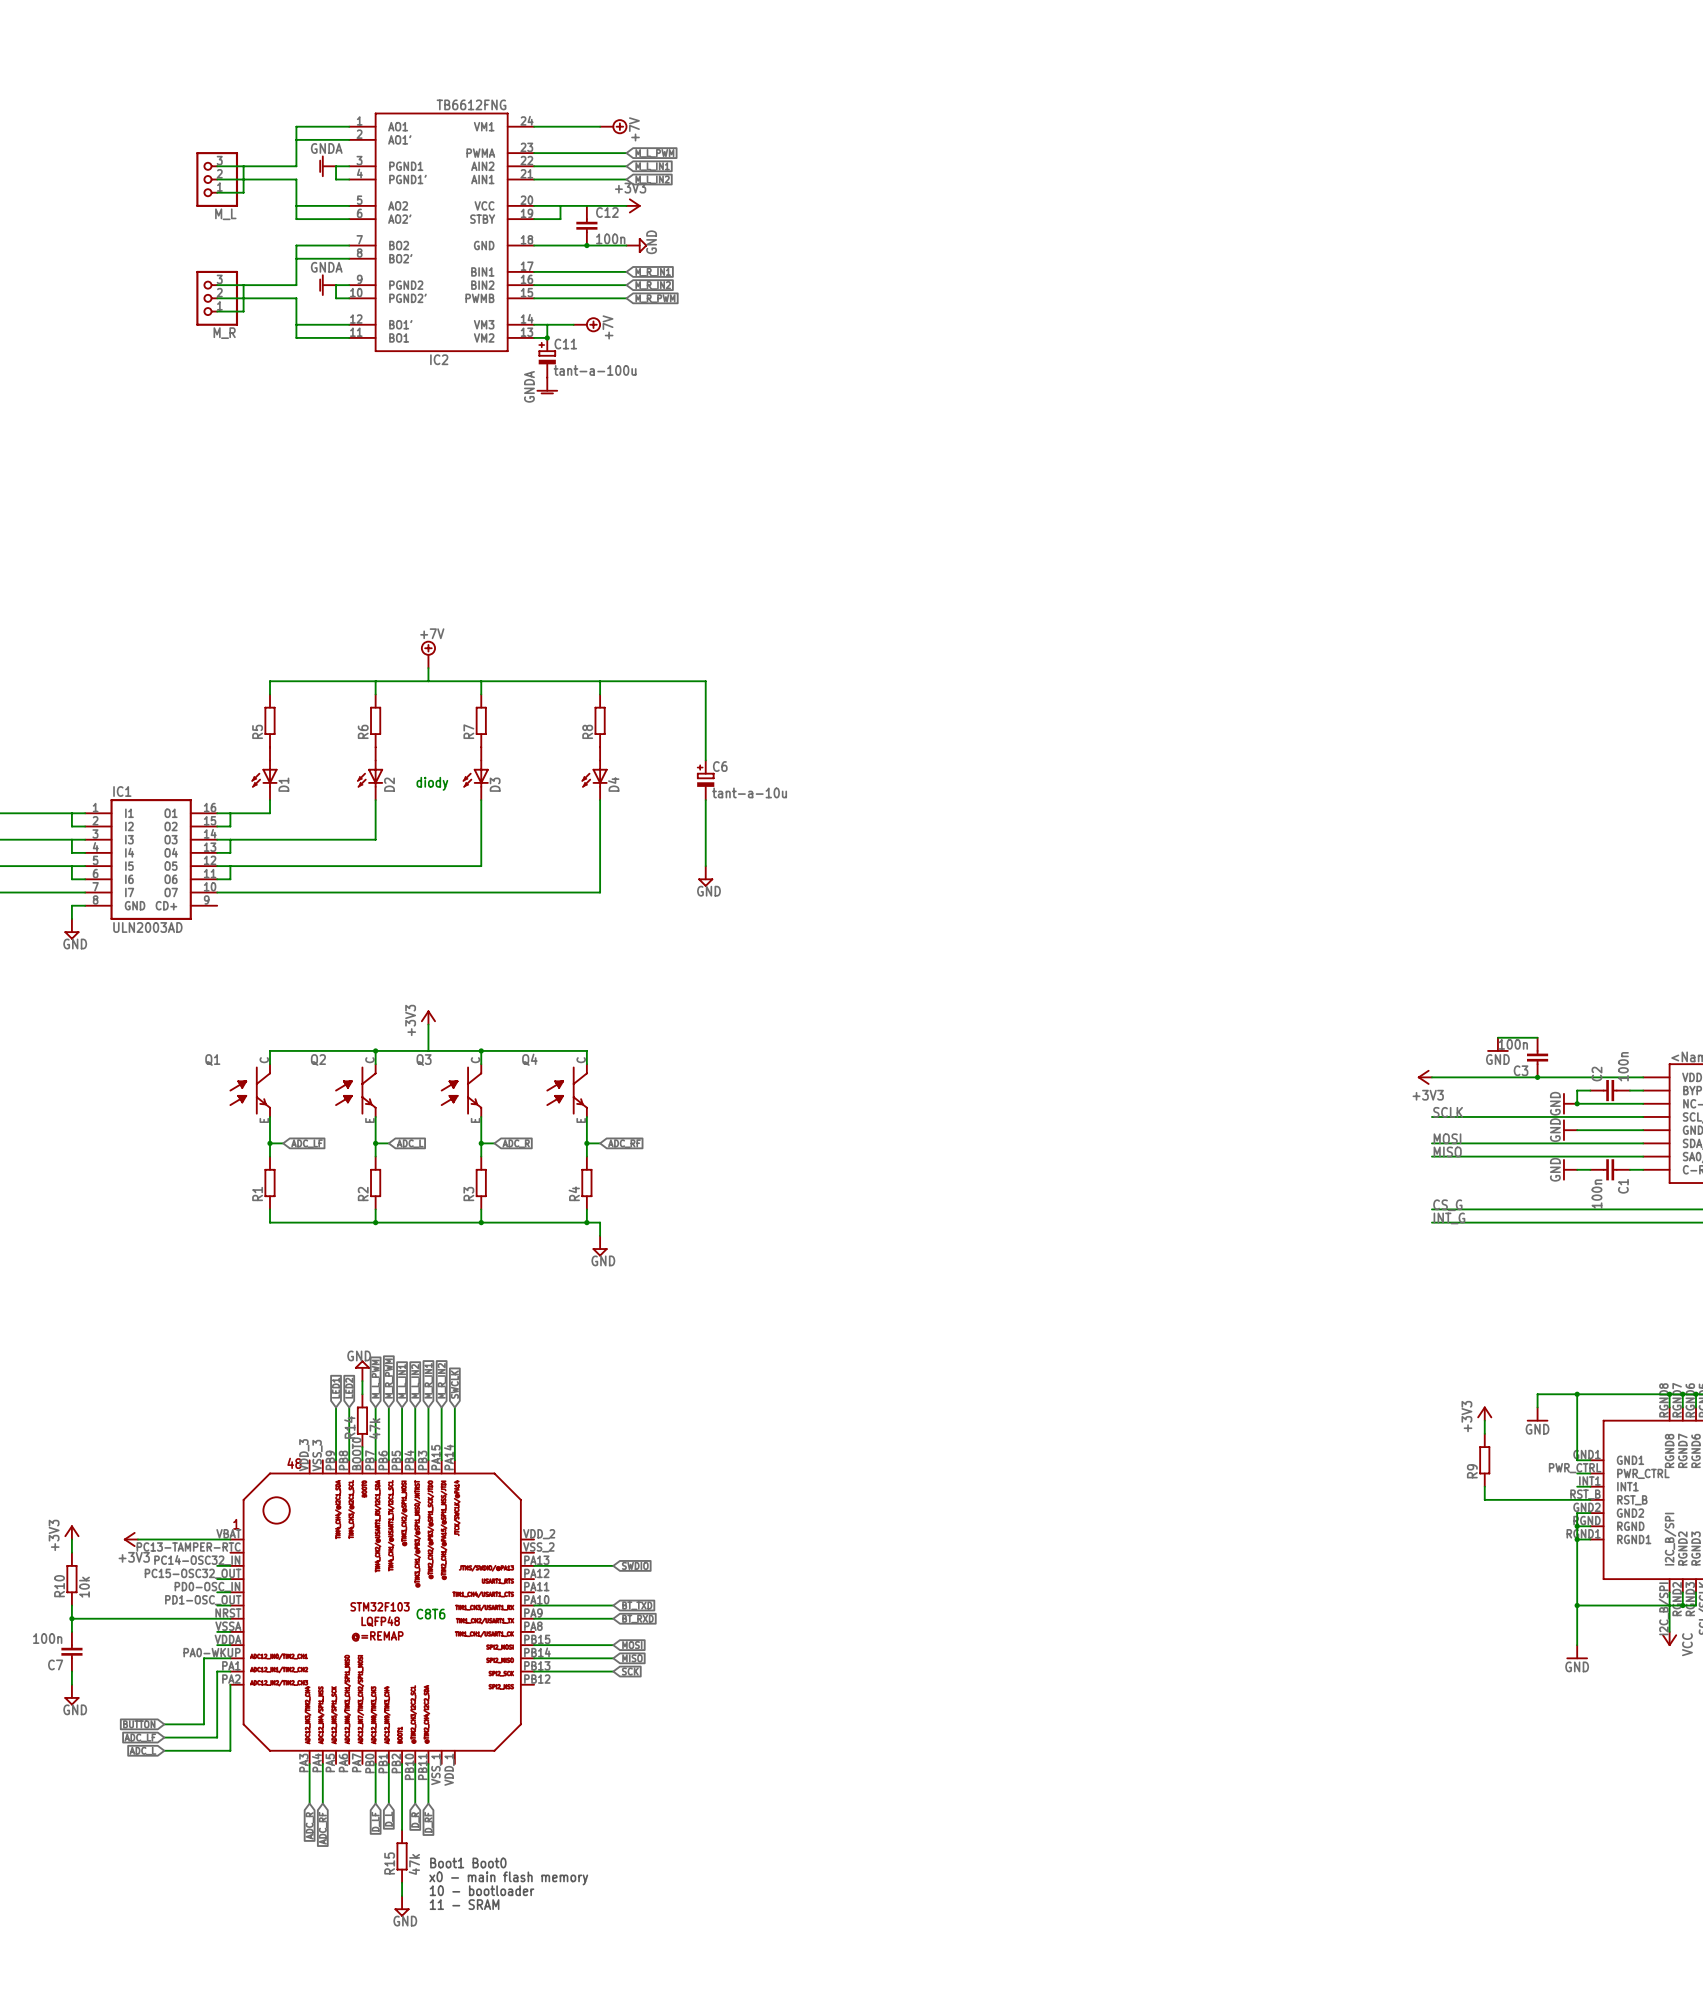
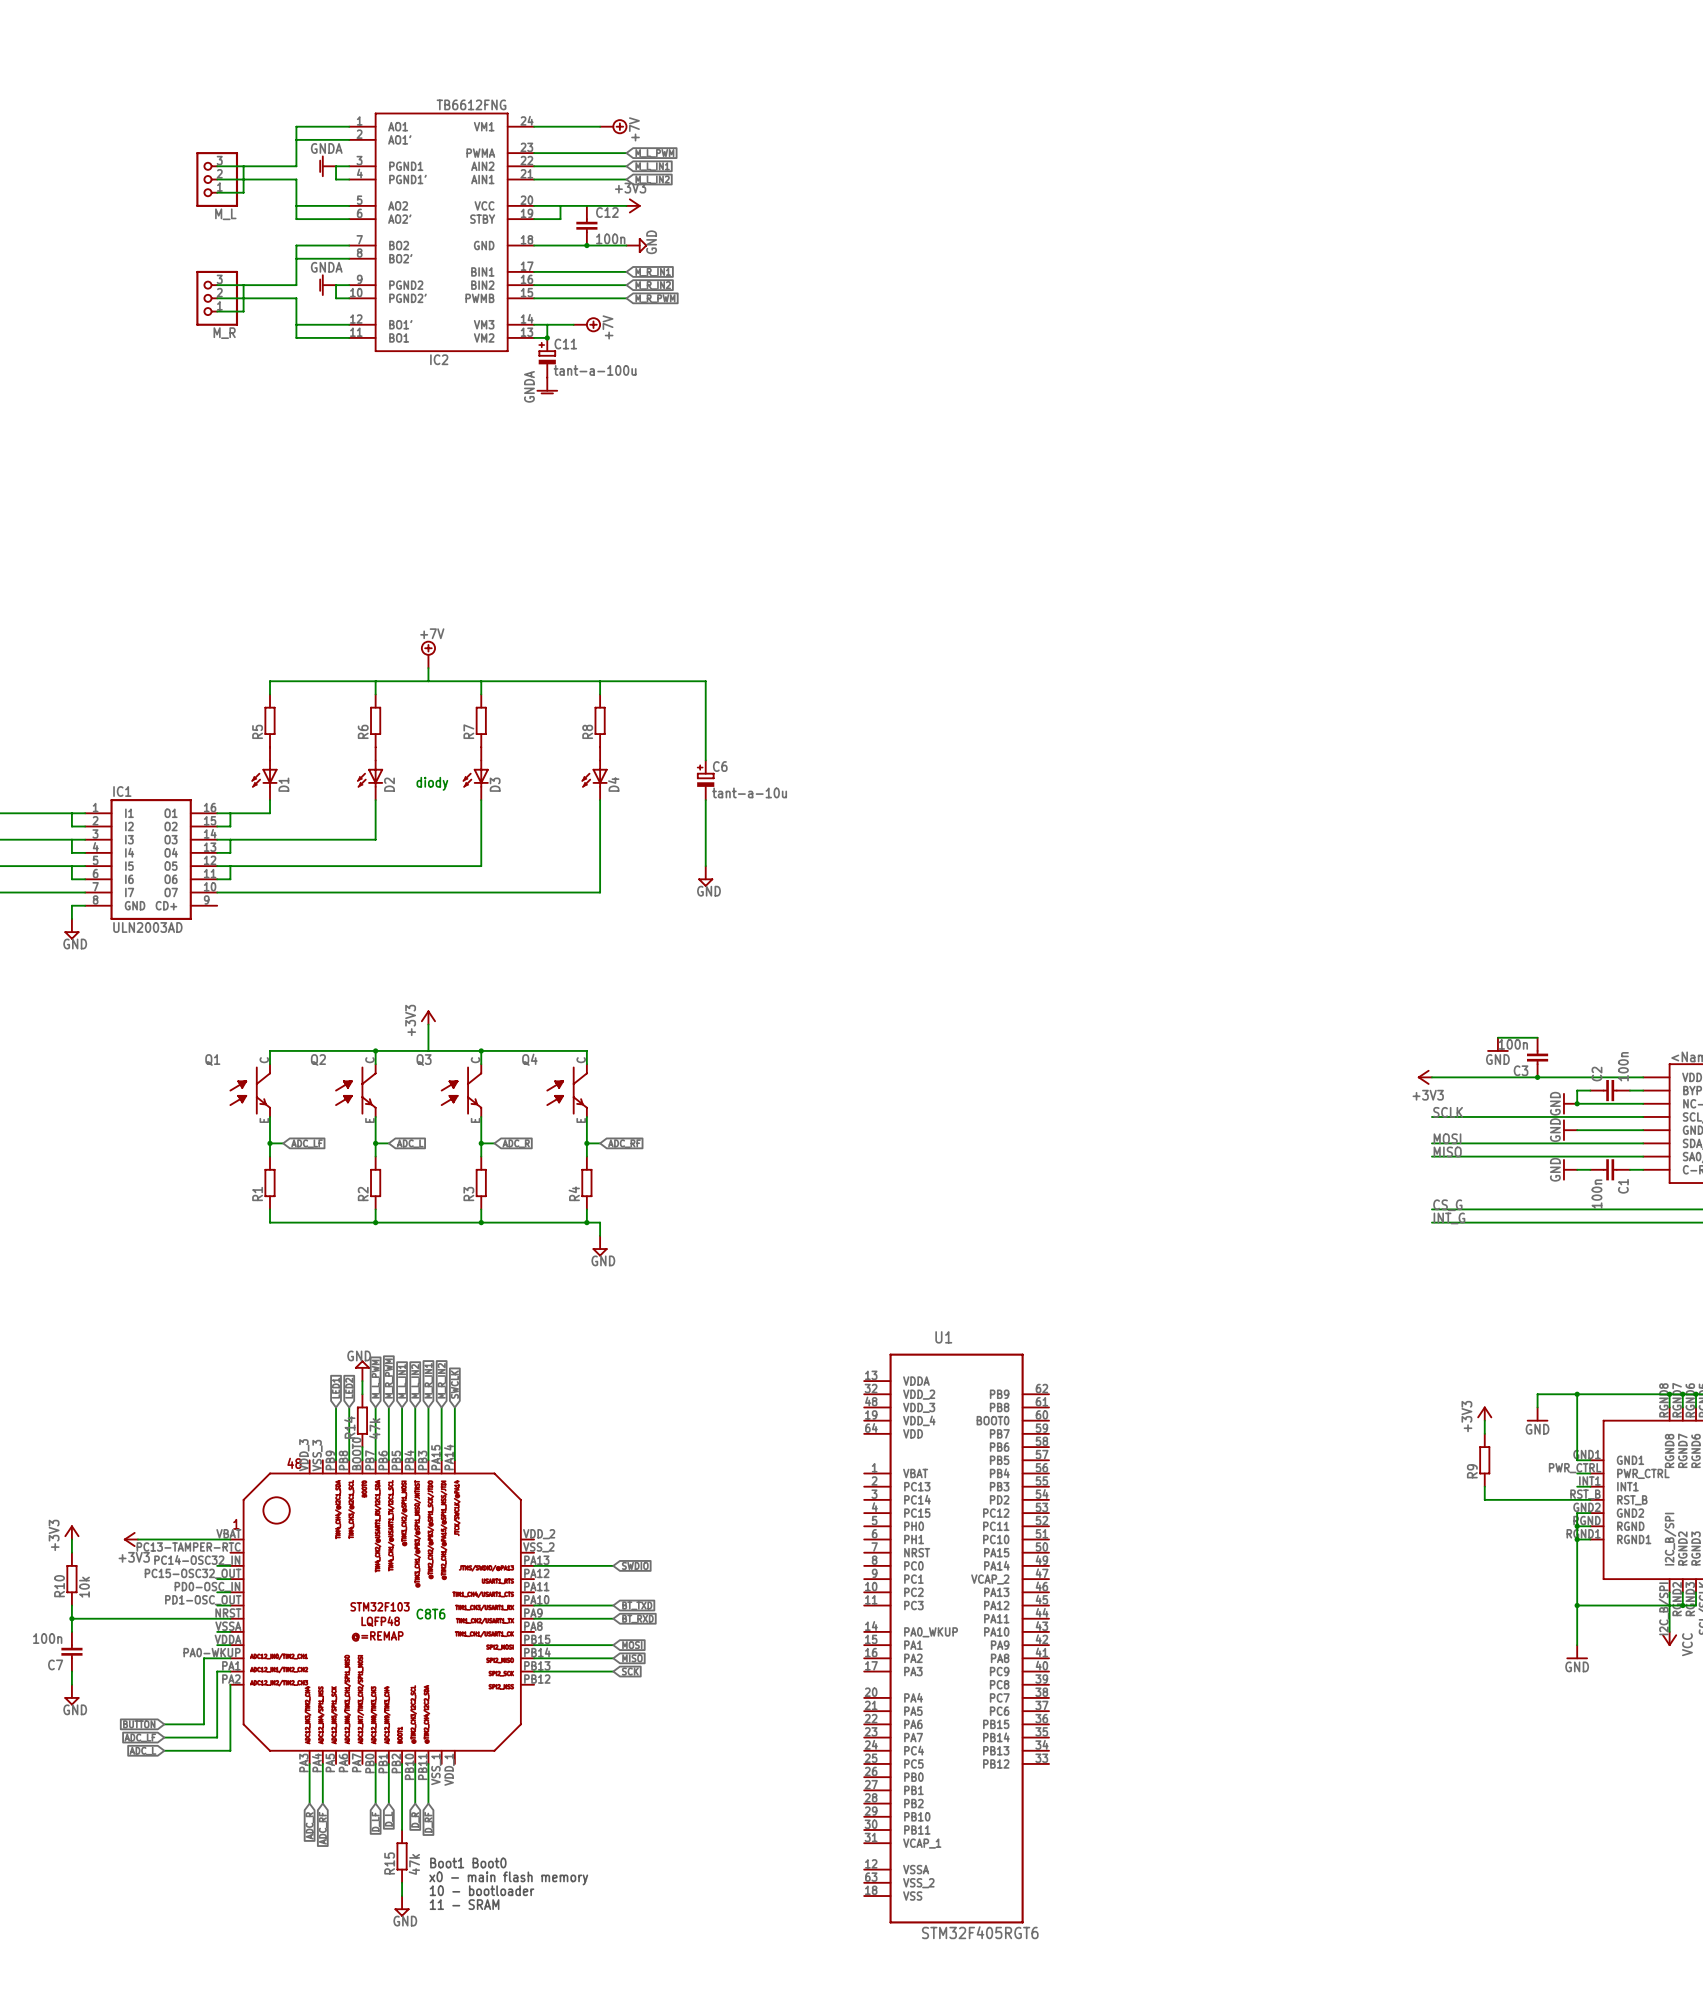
U1: none -> STM32F405RGT6 (956, 1638)

